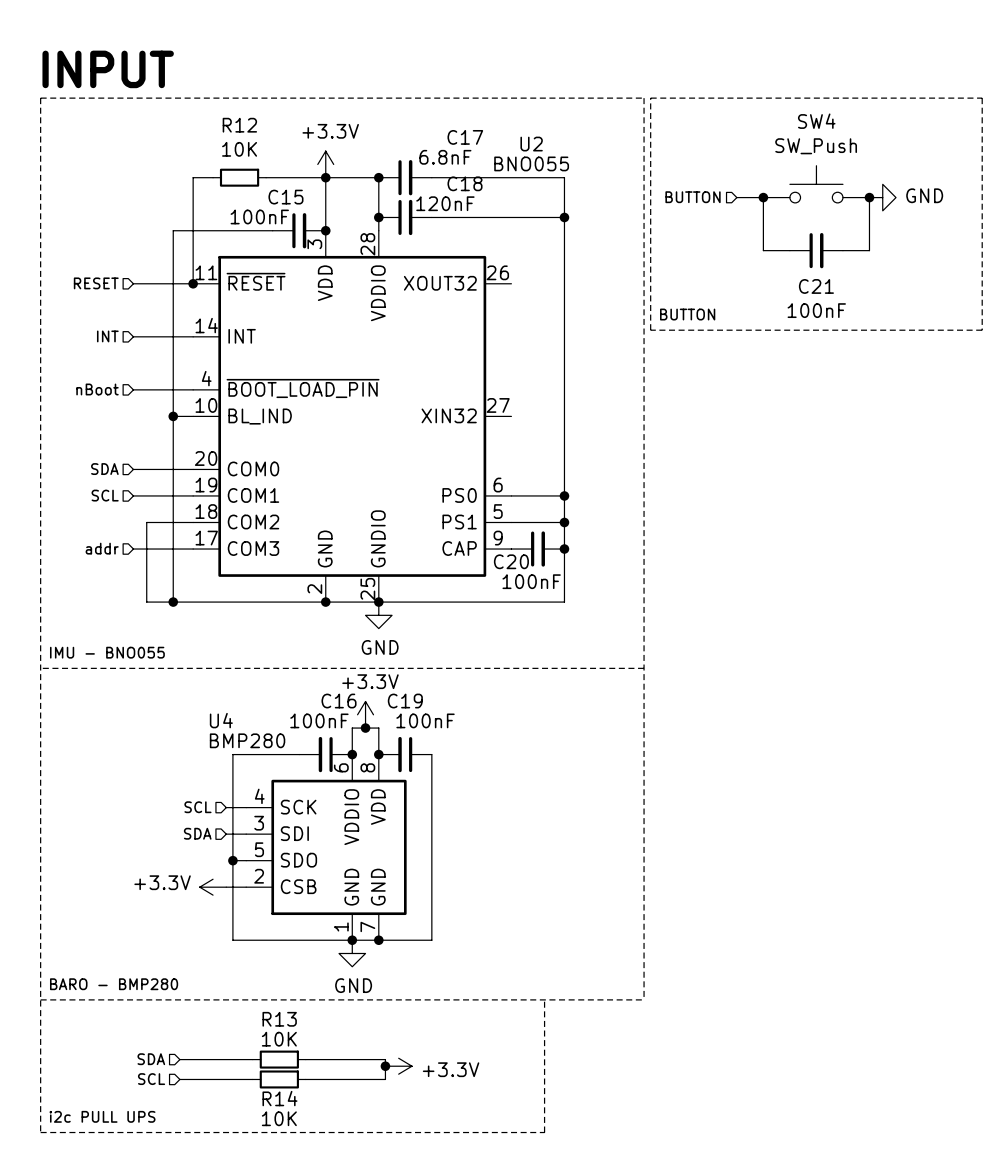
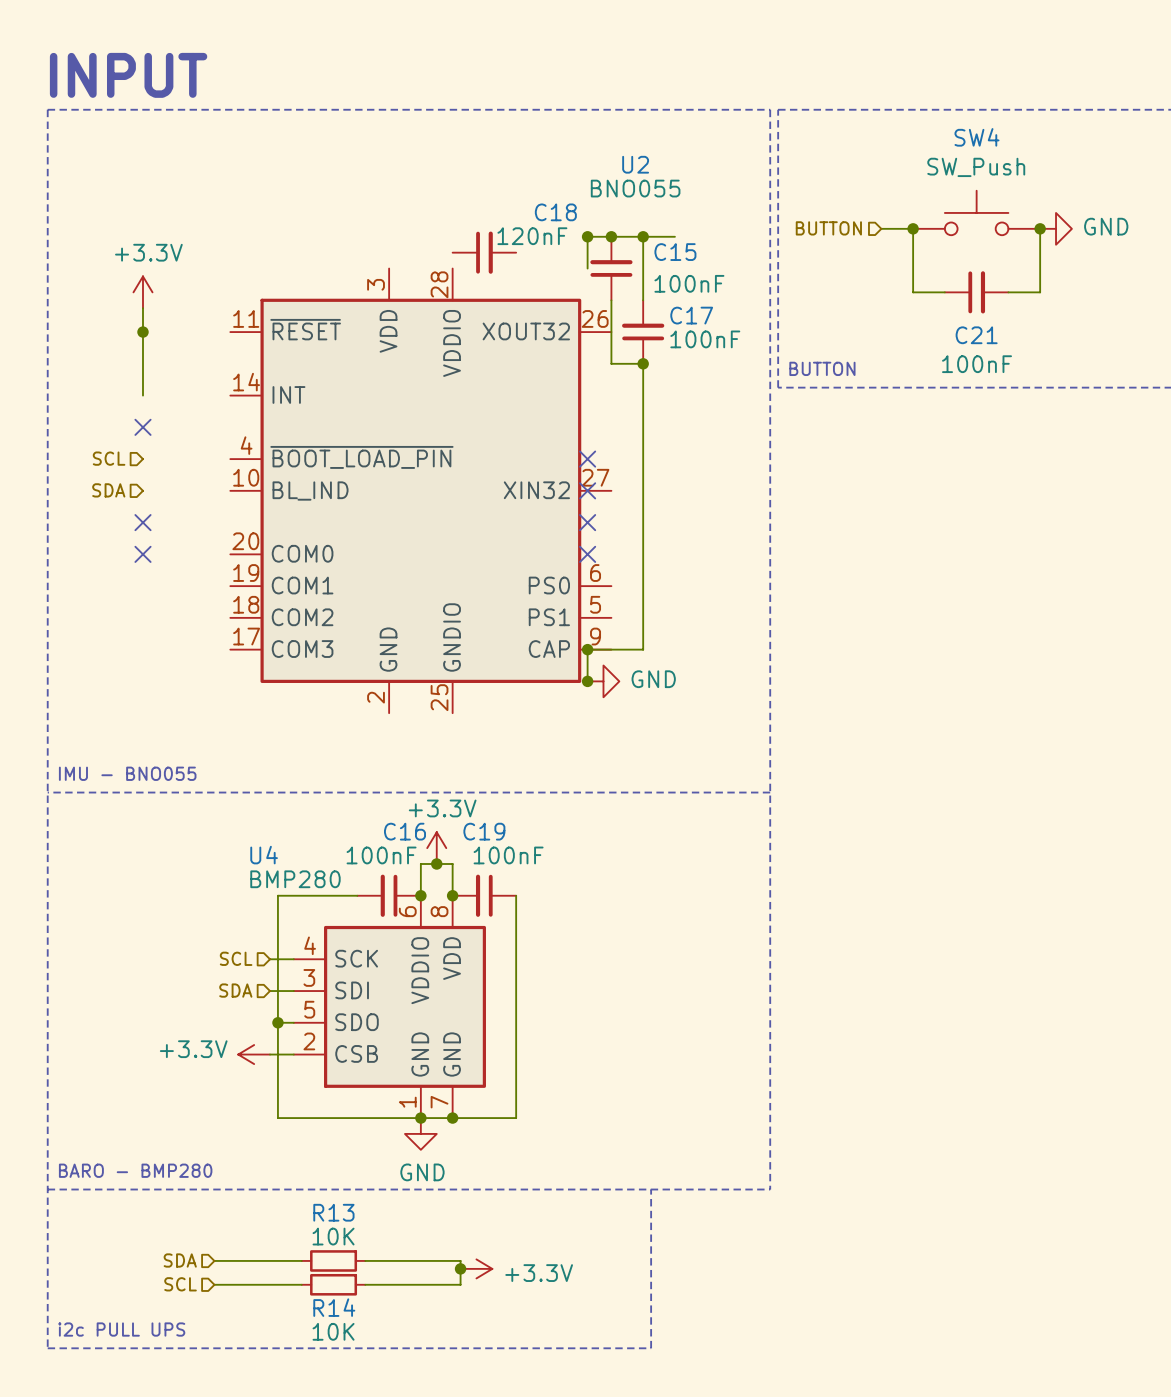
C17 name position: C17 (465, 137) -> C17 (691, 315)
C17 value: 6.8nF (445, 157) -> 100nF (705, 339)
power symbol position: +3.3V (325, 164) -> +3.3V (142, 292)
wire: (213, 177) (193, 177) (193, 283) (133, 283) -> none
R12: 10K (239, 177) -> none
wire: (266, 177) (378, 177) (378, 230) -> none
wire: (325, 177) (325, 230) -> (643, 236) (643, 300)
junction: (325, 177) -> none
junction: (378, 177) -> none
C17 rotation: 0° (405, 177) -> 90° counterclockwise (643, 331)
C17 position: (405, 177) -> (643, 332)
wire: (431, 177) (564, 177) (564, 602) (146, 602) (146, 522) (193, 522) -> none
C15 name position: C15 (285, 197) -> C15 (675, 252)
junction: none -> (587, 236)
junction: none -> (611, 236)
junction: none -> (643, 236)
wire: none -> (674, 236) (587, 236) (587, 268)
C15 value position: 100nF (259, 216) -> 100nF (689, 283)
junction: (378, 217) -> none
wire: (431, 217) (564, 217) -> none
junction: (564, 217) -> none
wire: (272, 230) (173, 230) (173, 602) -> none
C15 rotation: 0° (299, 230) -> 90° counterclockwise (611, 268)
C15 position: (299, 230) -> (611, 268)
junction: (325, 230) -> none
wire: none -> (611, 300) (611, 363) (643, 363) (643, 649) (587, 649) (587, 681)
wire: none -> (142, 308) (142, 395)
hierarchical label: RESET (96, 283) -> none
junction: none -> (142, 332)
junction: (193, 283) -> none
junction: none -> (643, 363)
hierarchical label: INT (107, 336) -> none
wire: (133, 336) (193, 336) -> none
no-connect mark: none -> (142, 427)
hierarchical label: nBoot (97, 389) -> none
wire: (133, 389) (193, 389) -> none
no-connect mark: none -> (587, 459)
wire: (173, 416) (193, 416) -> none
junction: (173, 416) -> none
no-connect mark: none -> (587, 490)
no-connect mark: none -> (142, 522)
no-connect mark: none -> (587, 522)
hierarchical label position: SDA (104, 469) -> SDA (108, 490)
no-connect mark: none -> (142, 554)
wire: (133, 469) (193, 469) -> none
no-connect mark: none -> (587, 554)
hierarchical label position: SCL (105, 495) -> SCL (109, 458)
wire: (133, 495) (193, 495) -> none
wire: (511, 495) (564, 495) -> none
junction: (564, 495) -> none
wire: (511, 522) (564, 522) -> none
junction: (564, 522) -> none
hierarchical label: addr (102, 548) -> none
wire: (133, 549) (193, 549) -> none
junction: none -> (587, 649)
C20: 100nF (537, 549) -> none
junction: (564, 549) -> none
junction: none -> (587, 681)
junction: (173, 602) -> none
junction: (325, 602) -> none
junction: (378, 602) -> none
power symbol rotation: 0° (378, 615) -> 90° counterclockwise (603, 681)
power symbol position: GND (378, 615) -> GND (603, 681)

